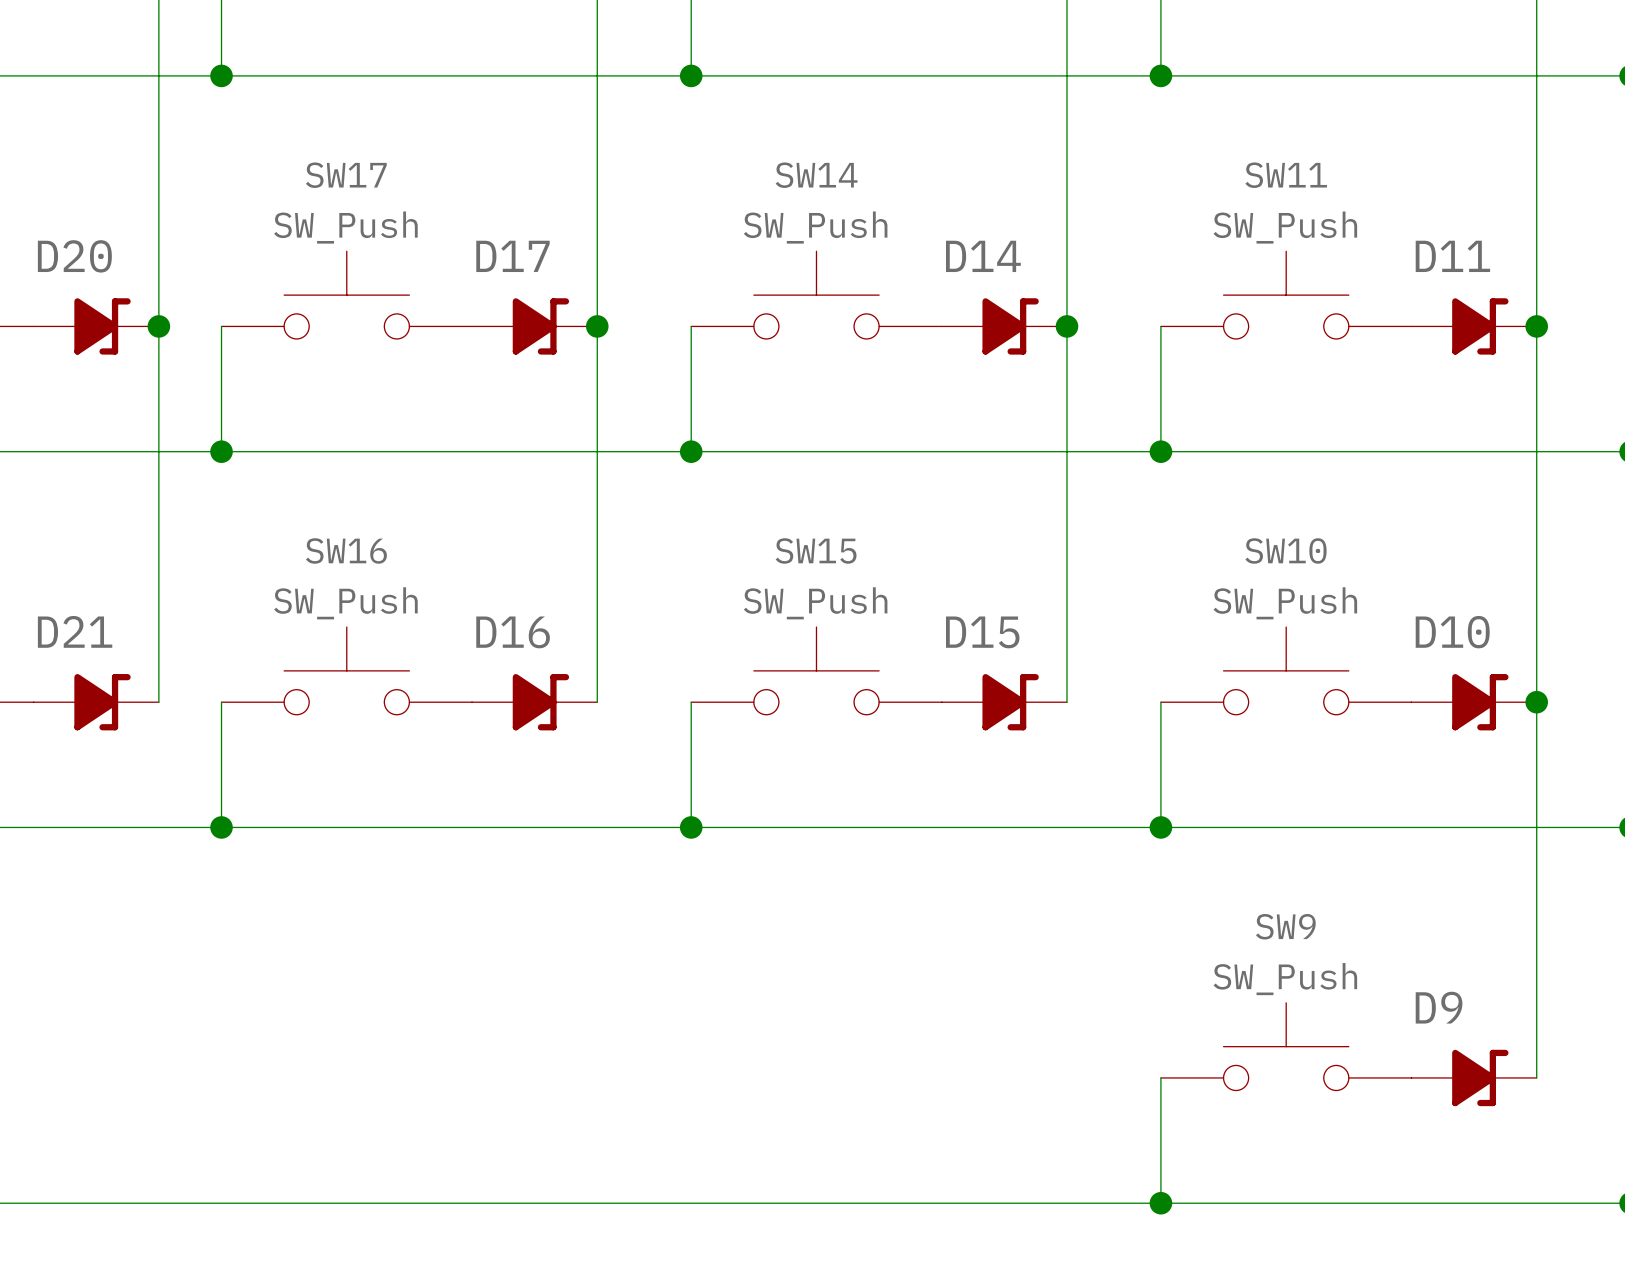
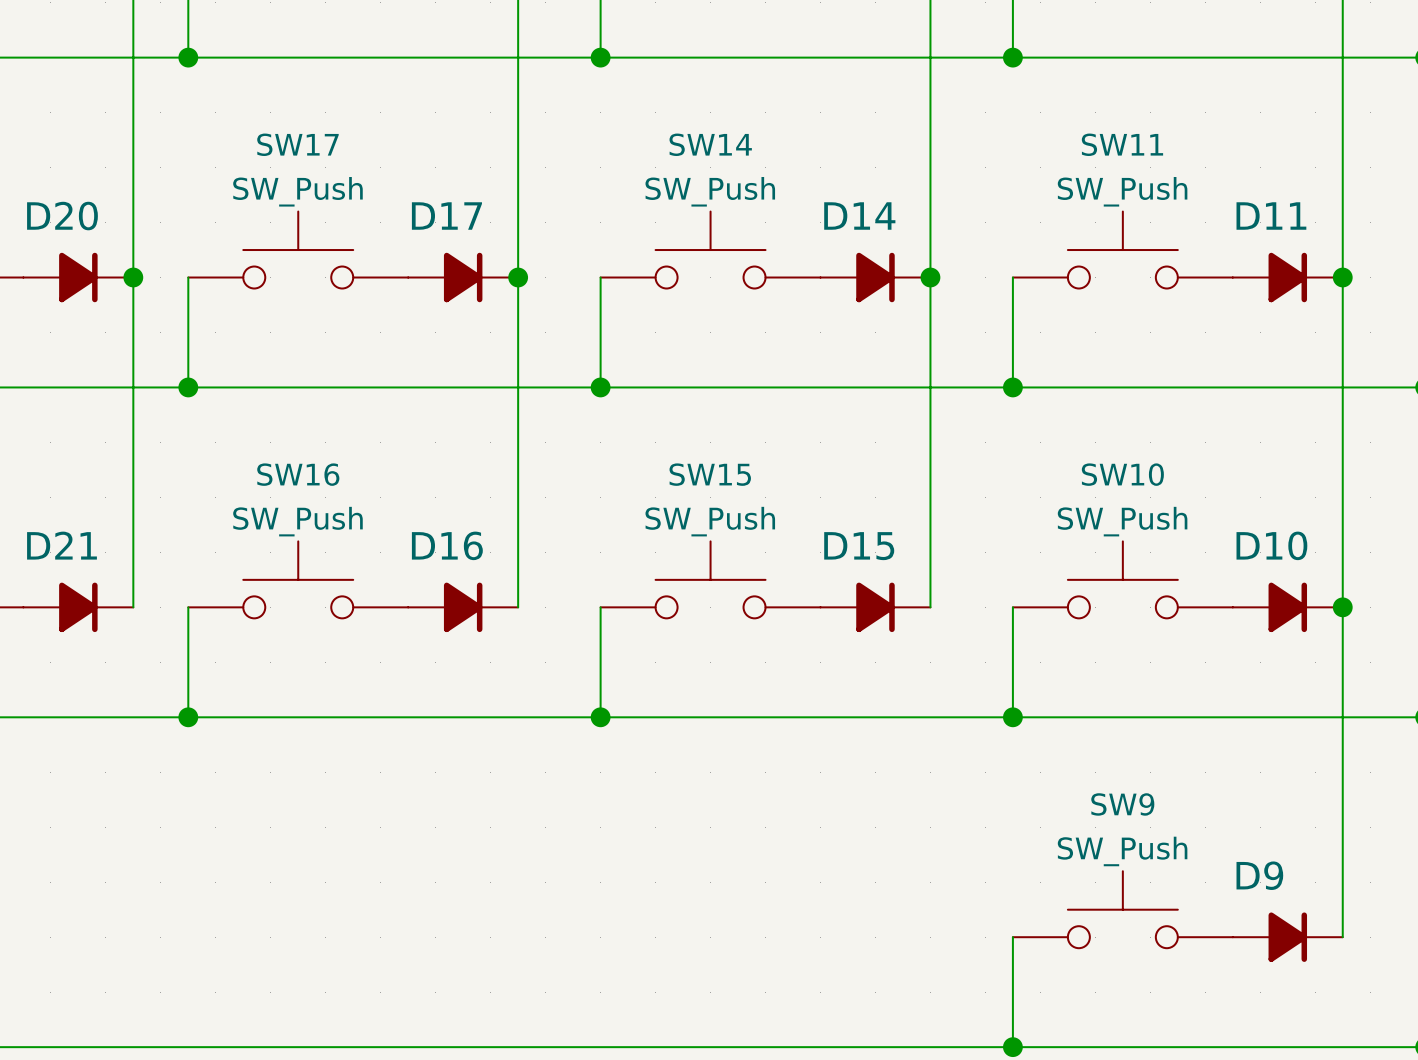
D20 symbol: [33, 298, 159, 355] -> [23, 252, 134, 303]
D17 symbol: [472, 298, 598, 355] -> [408, 252, 519, 303]
D14 symbol: [941, 298, 1067, 355] -> [820, 252, 931, 303]
D11 symbol: [1411, 298, 1537, 355] -> [1232, 252, 1343, 303]
D21 symbol: [33, 674, 159, 731] -> [23, 582, 134, 633]
D16 symbol: [472, 674, 598, 731] -> [408, 582, 519, 633]
D15 symbol: [941, 674, 1067, 731] -> [820, 582, 931, 633]
D10 symbol: [1411, 674, 1537, 731] -> [1232, 582, 1343, 633]
D9 symbol: [1411, 1049, 1537, 1107] -> [1232, 912, 1343, 962]

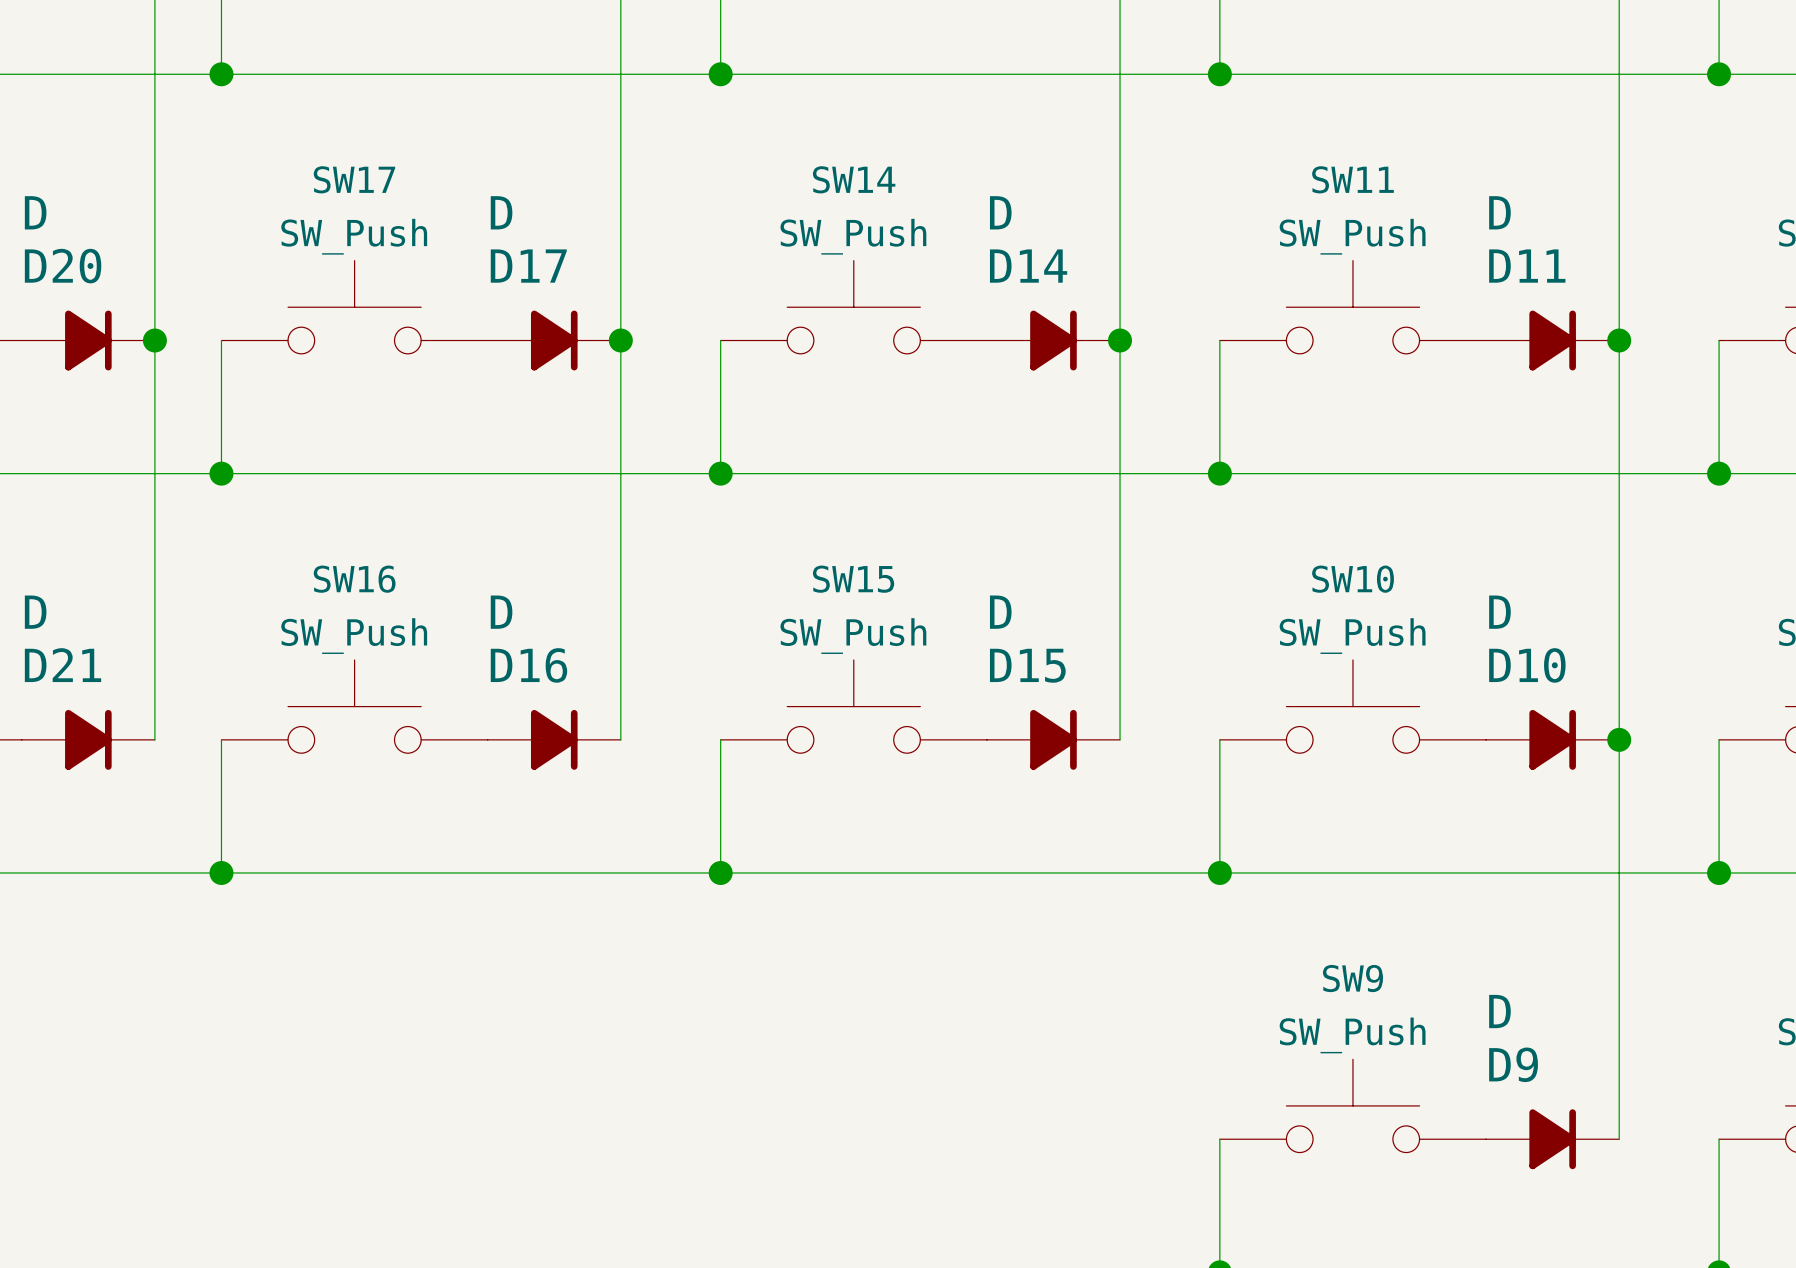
D20 value: none -> D (35, 212)
D17 value: none -> D (501, 212)
D14 value: none -> D (1000, 212)
D11 value: none -> D (1499, 212)
D21 value: none -> D (35, 612)
D16 value: none -> D (501, 612)
D15 value: none -> D (1000, 612)
D10 value: none -> D (1499, 612)
D9 value: none -> D (1499, 1011)

